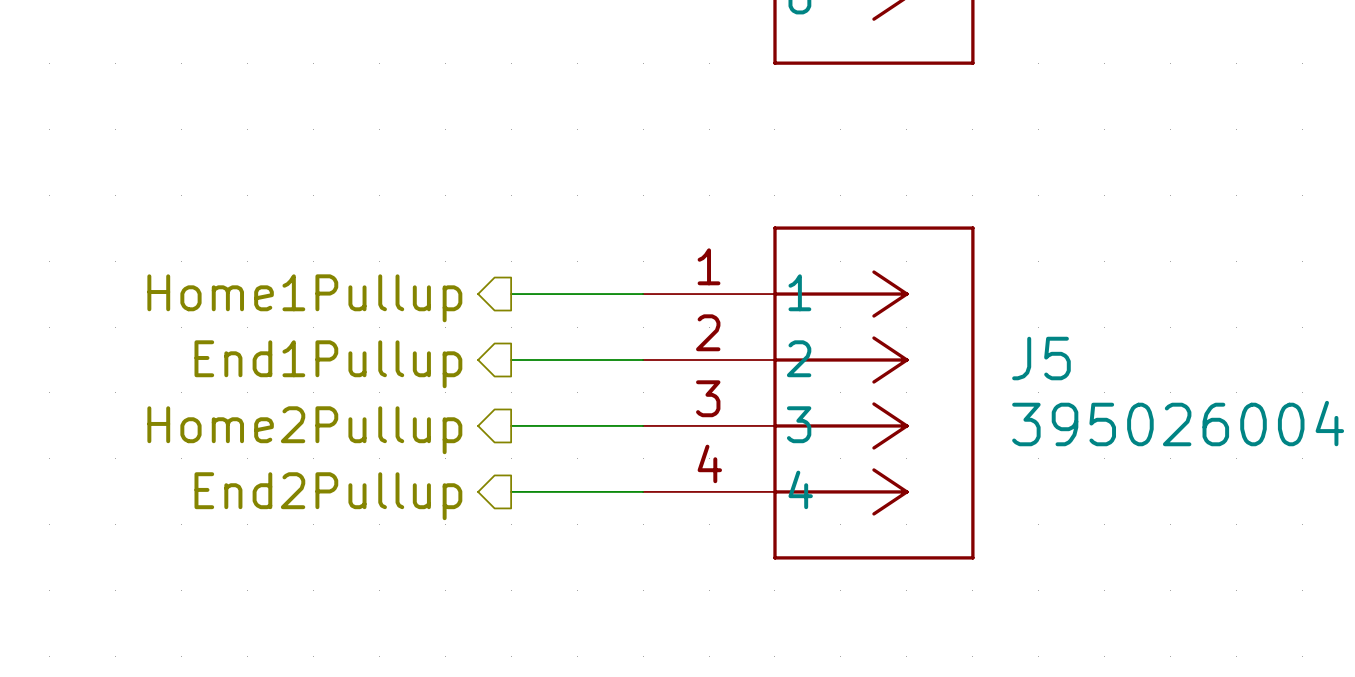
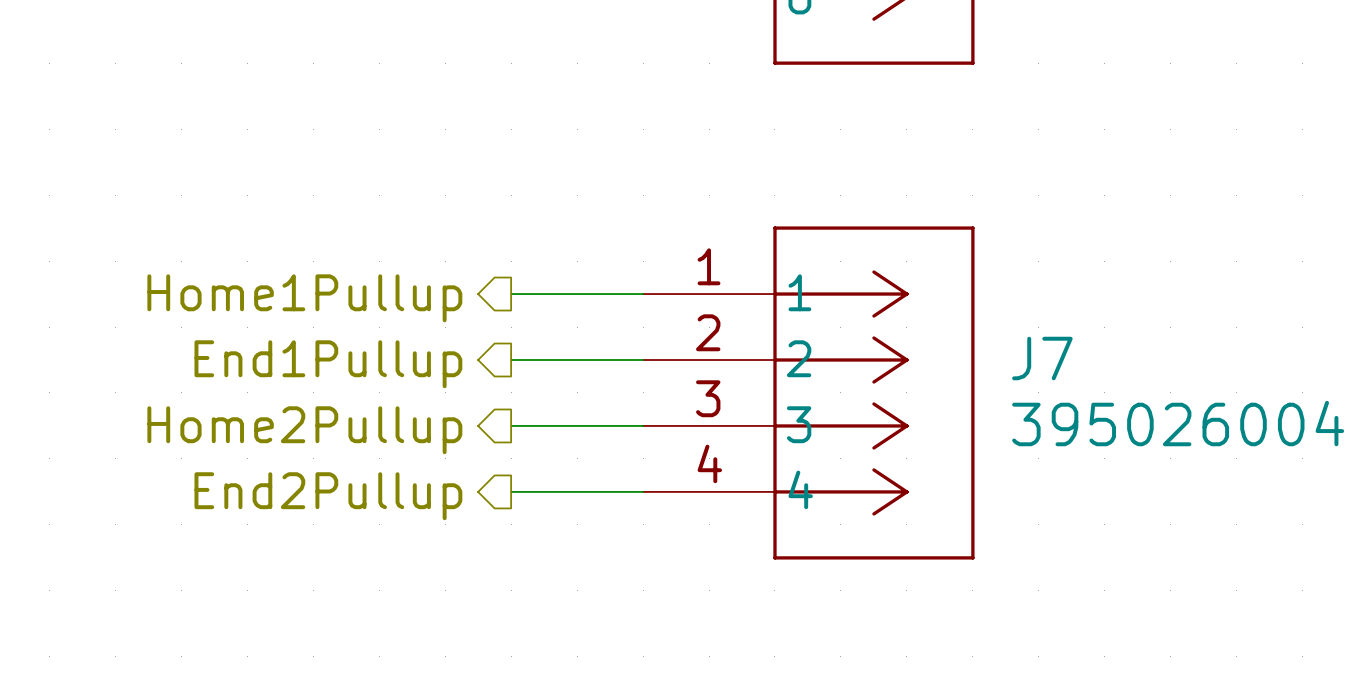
J5 name: J5 (1041, 358) -> J7 (1042, 358)

